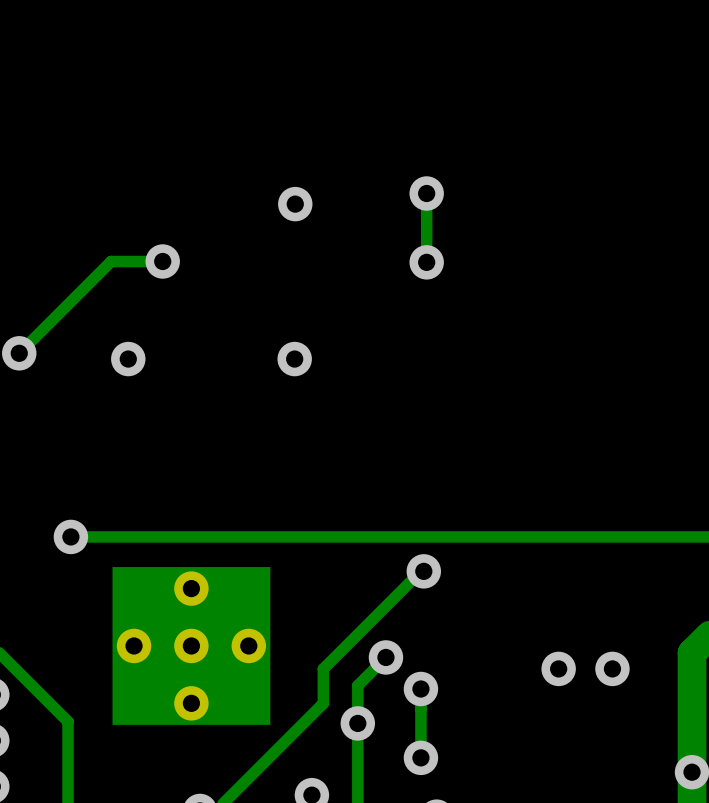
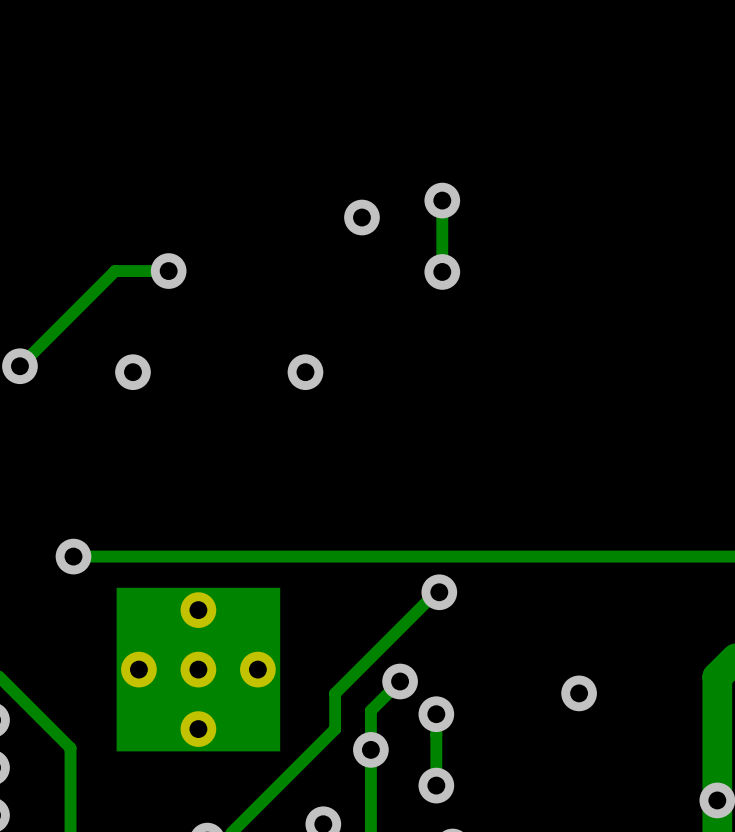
via position: (295, 204) -> (361, 217)
via: (612, 668) -> none

